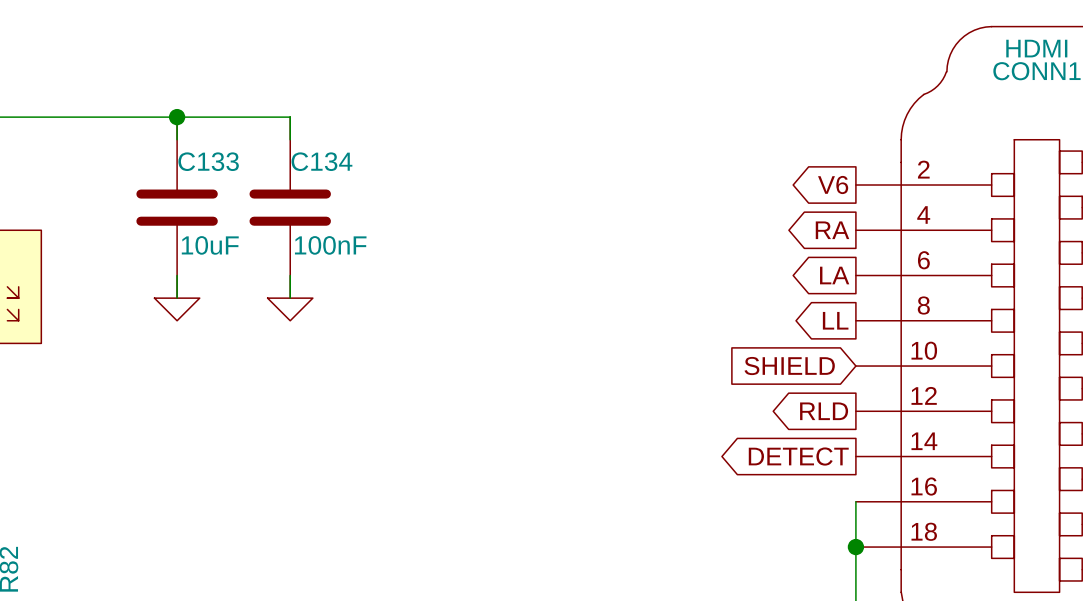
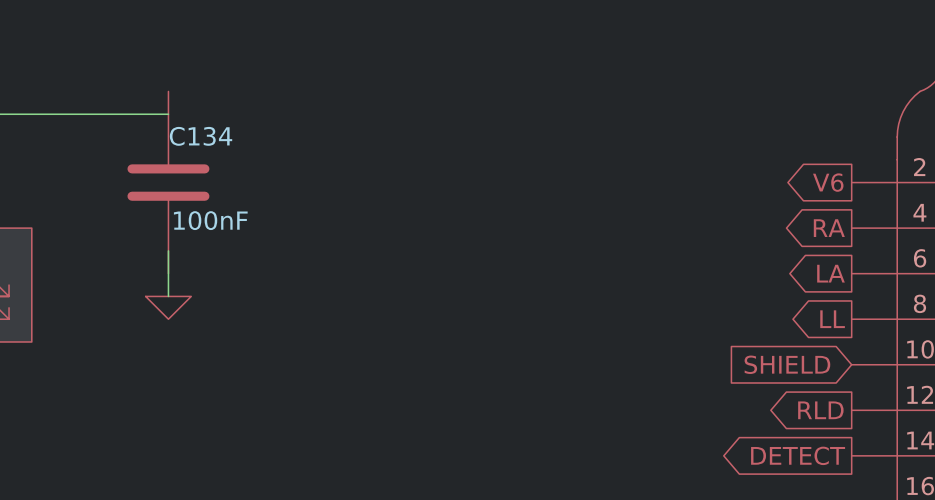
junction: (177, 117) -> none
wire: (177, 139) (177, 117) (290, 117) (290, 139) -> none
C133: 10uF (177, 207) -> none
C134 position: (290, 207) -> (168, 182)
power symbol: (290, 309) -> none

